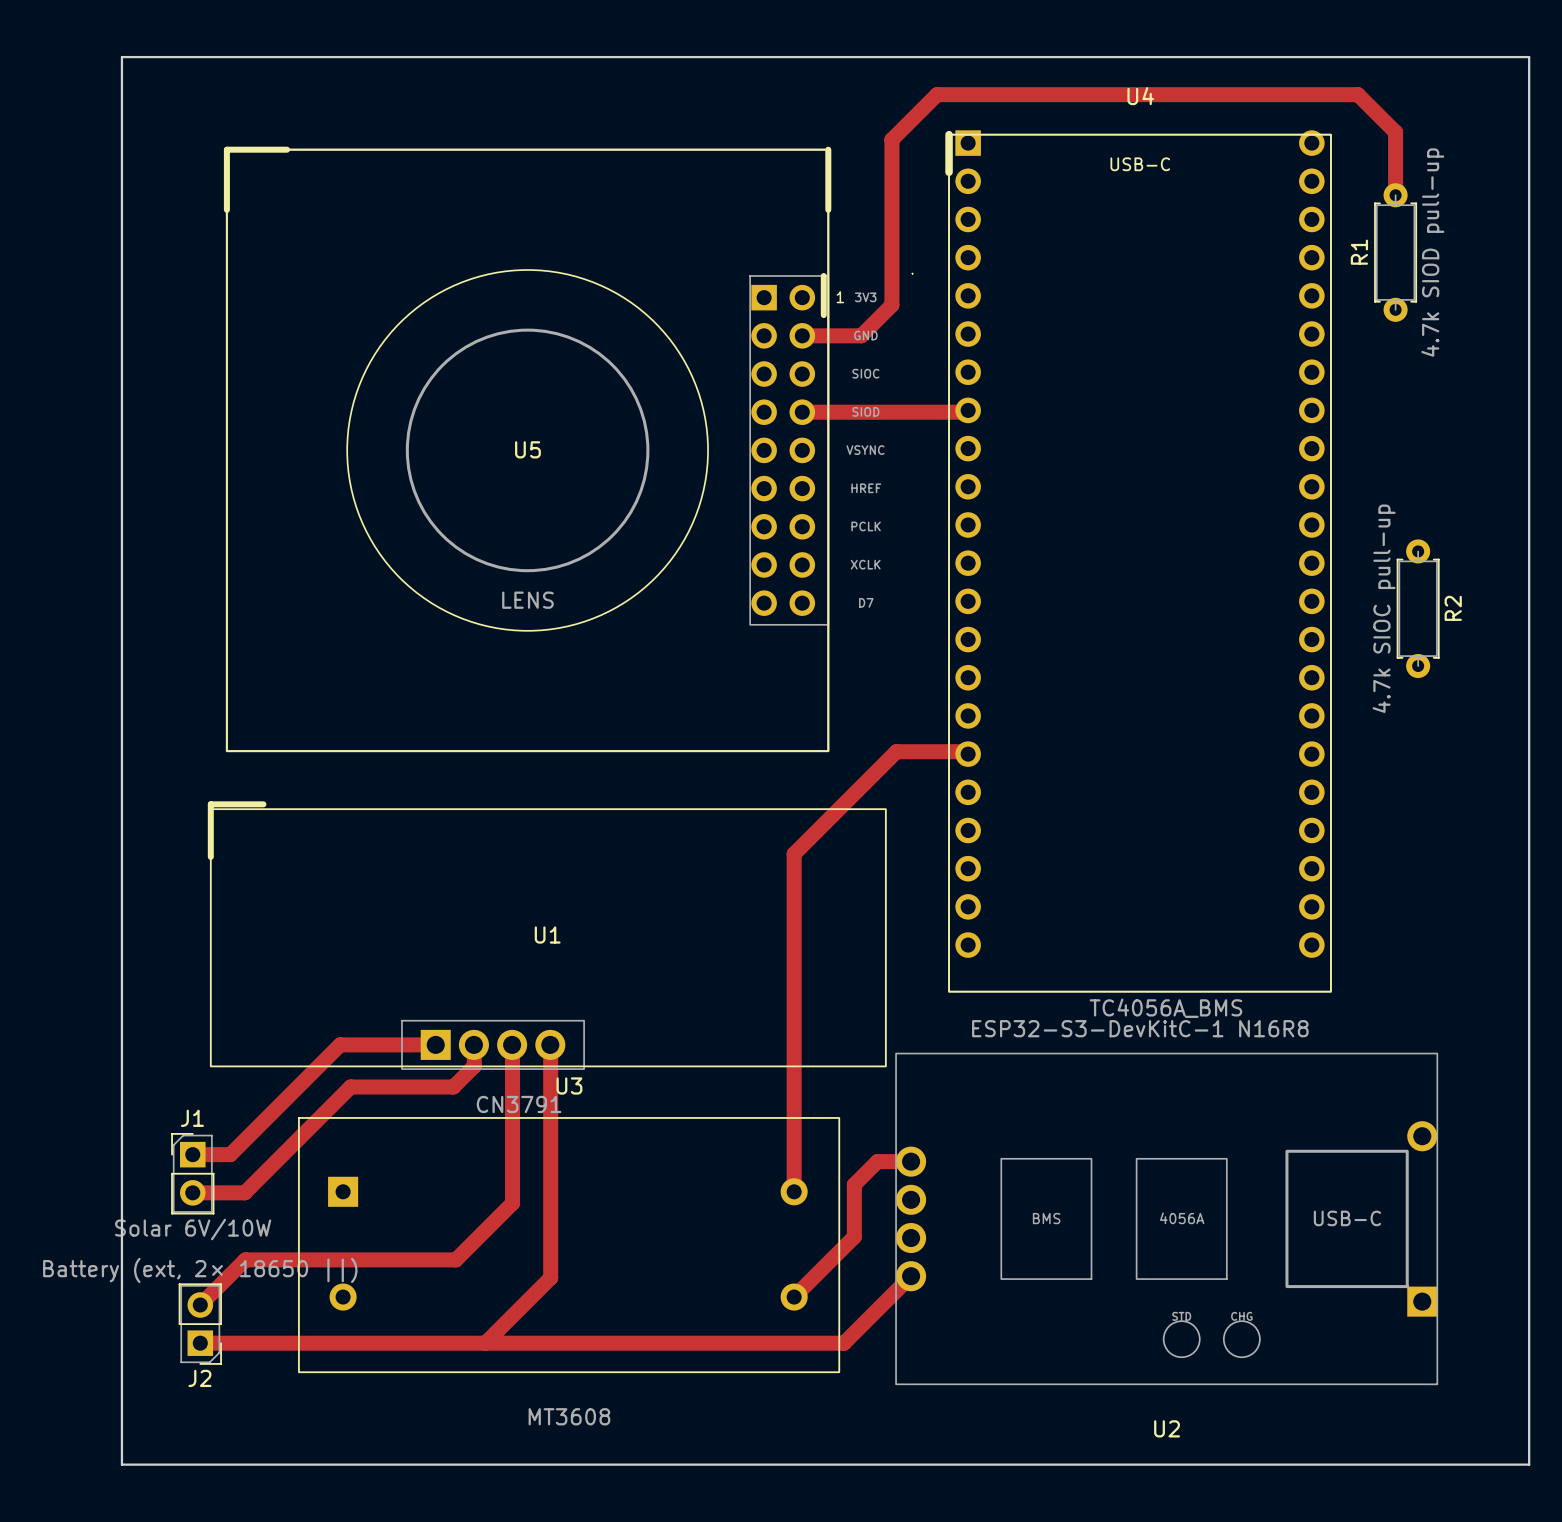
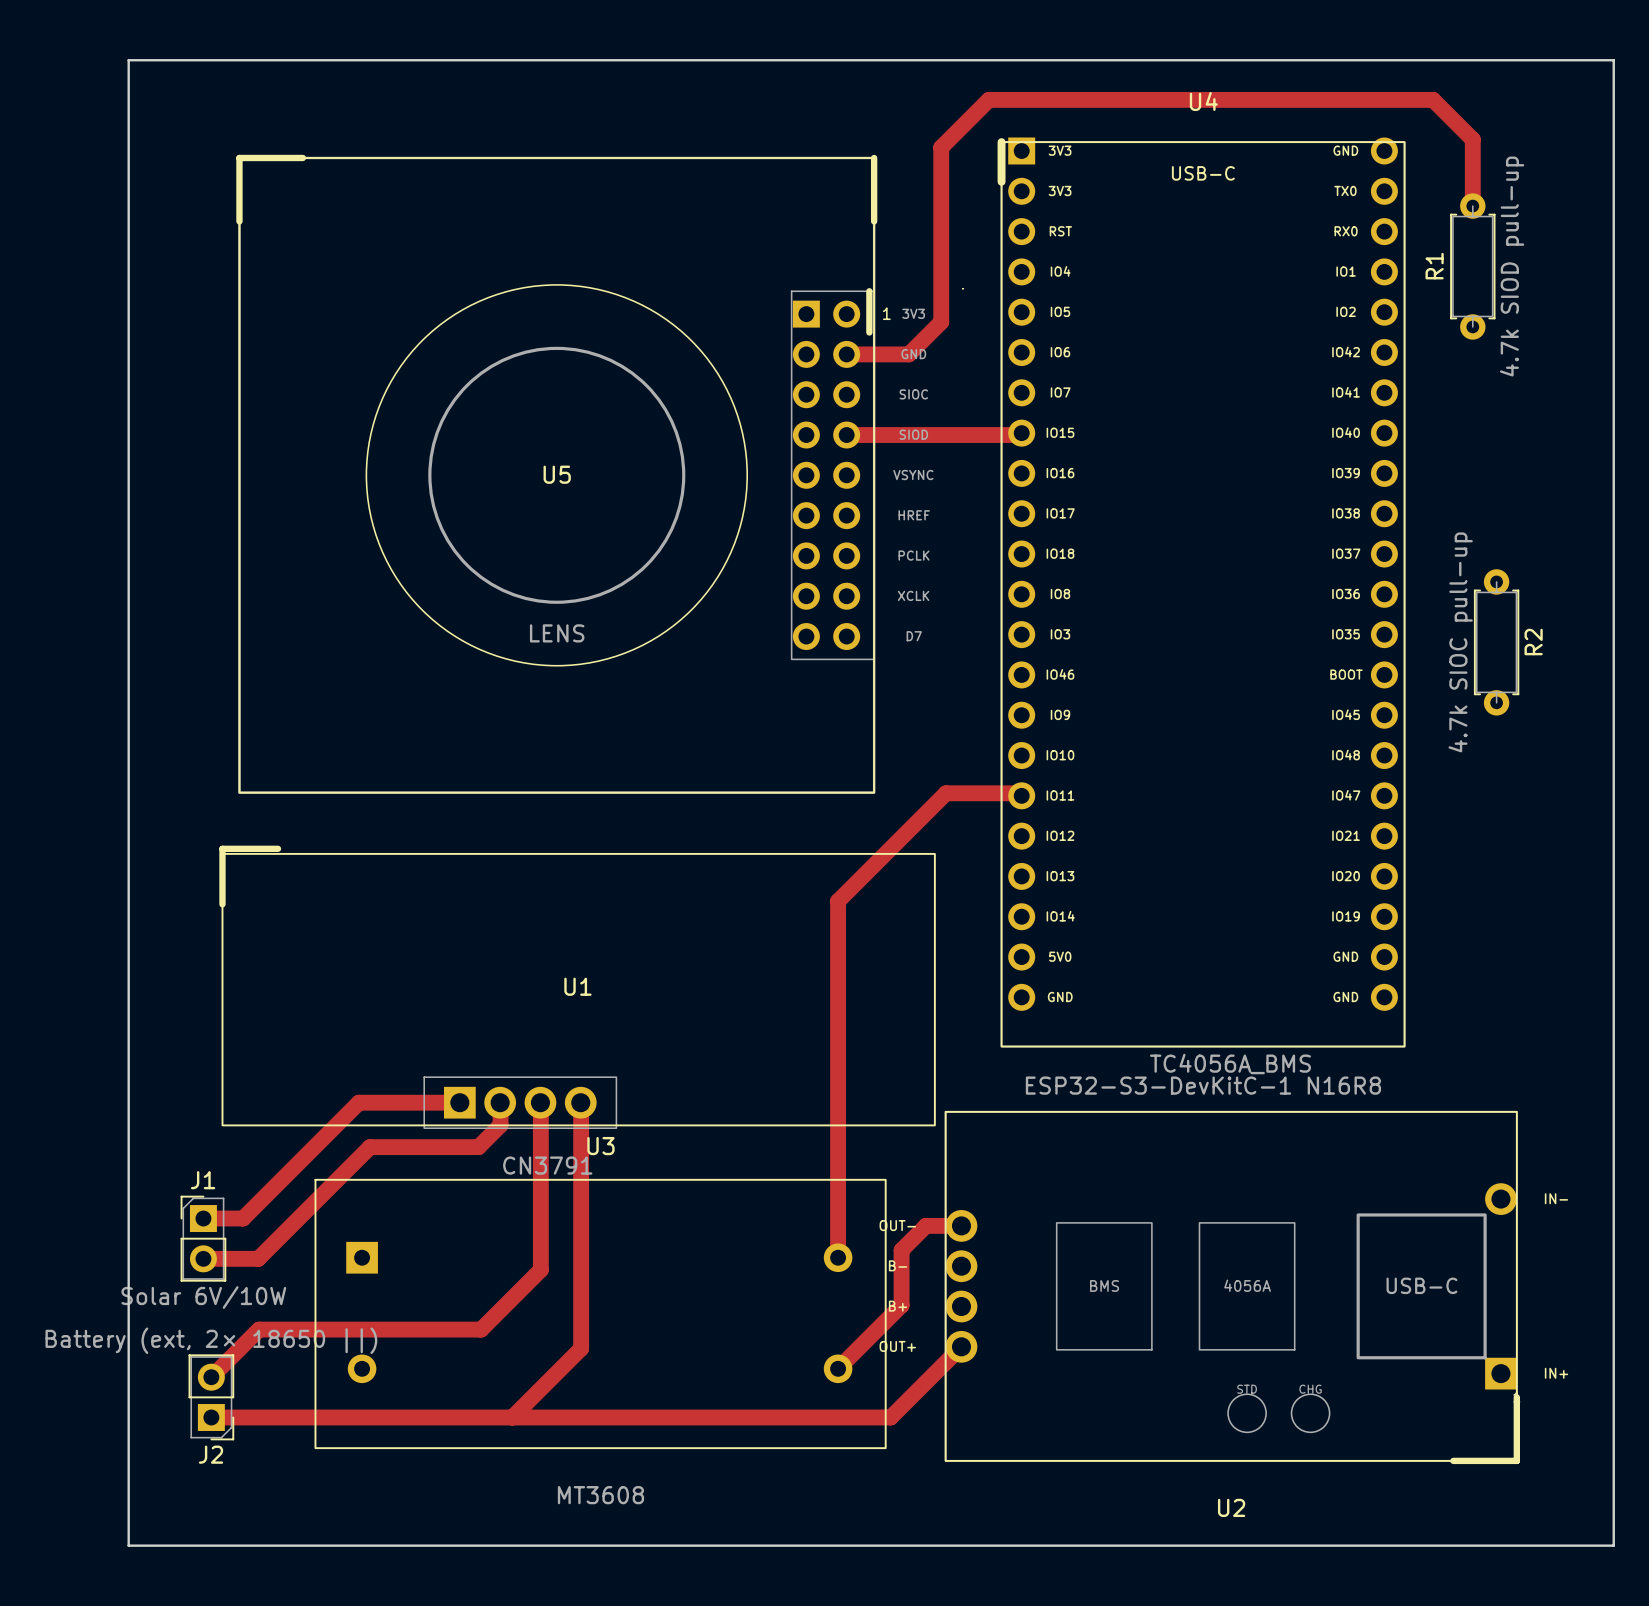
U4 footprint: [945, 130, 1332, 993] -> [997, 137, 1406, 1048]
U2 footprint: [895, 1052, 1439, 1386] -> [944, 1110, 1521, 1465]

